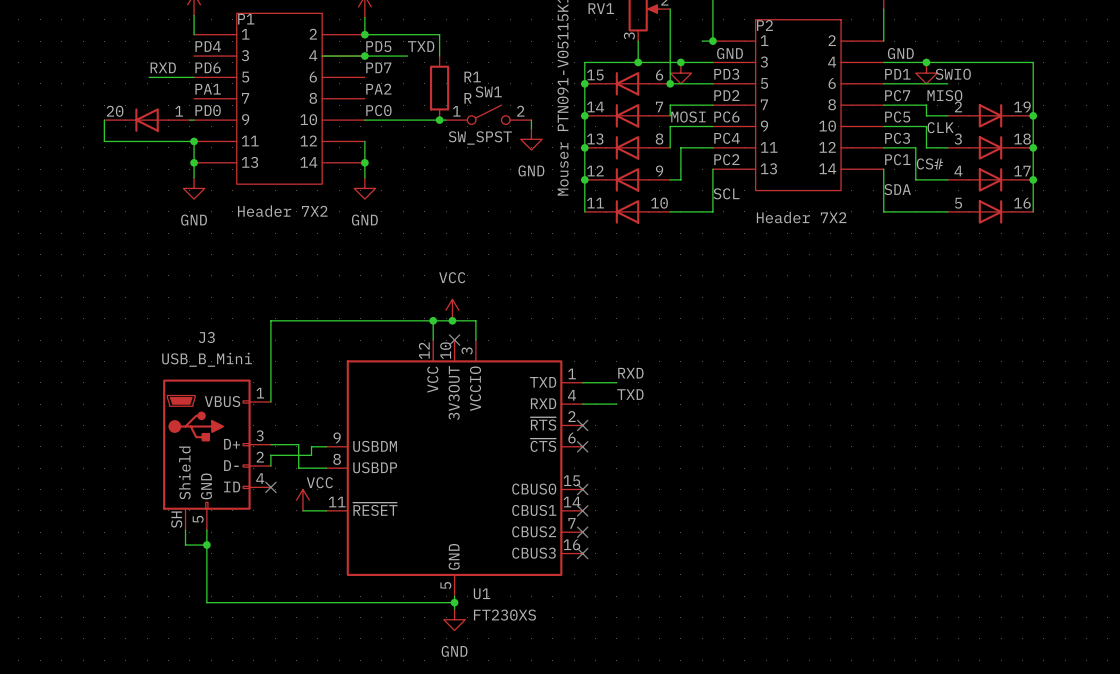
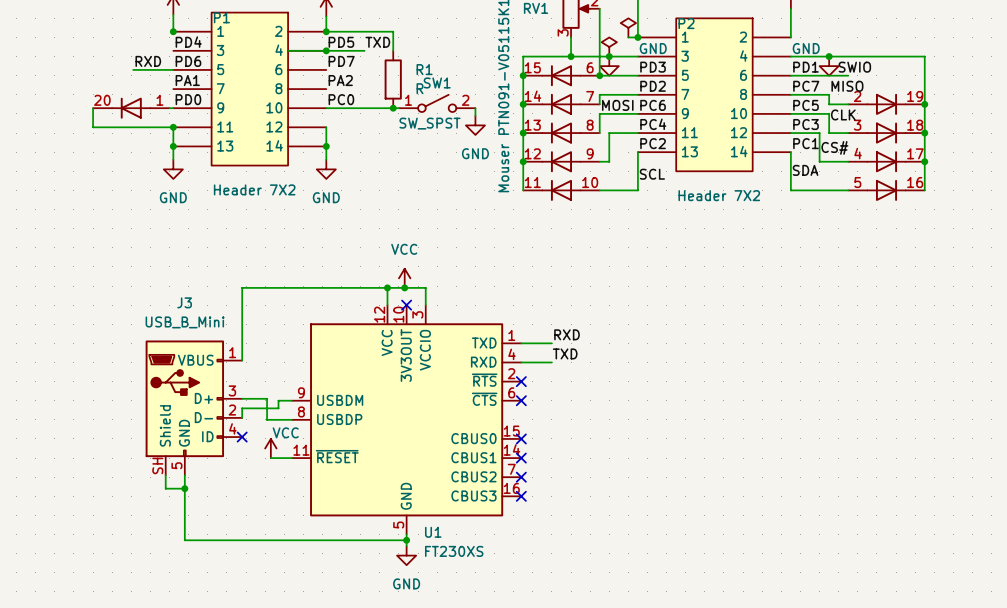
power symbol: none -> (628, 27)
junction: none -> (173, 31)
power symbol: none -> (609, 47)

